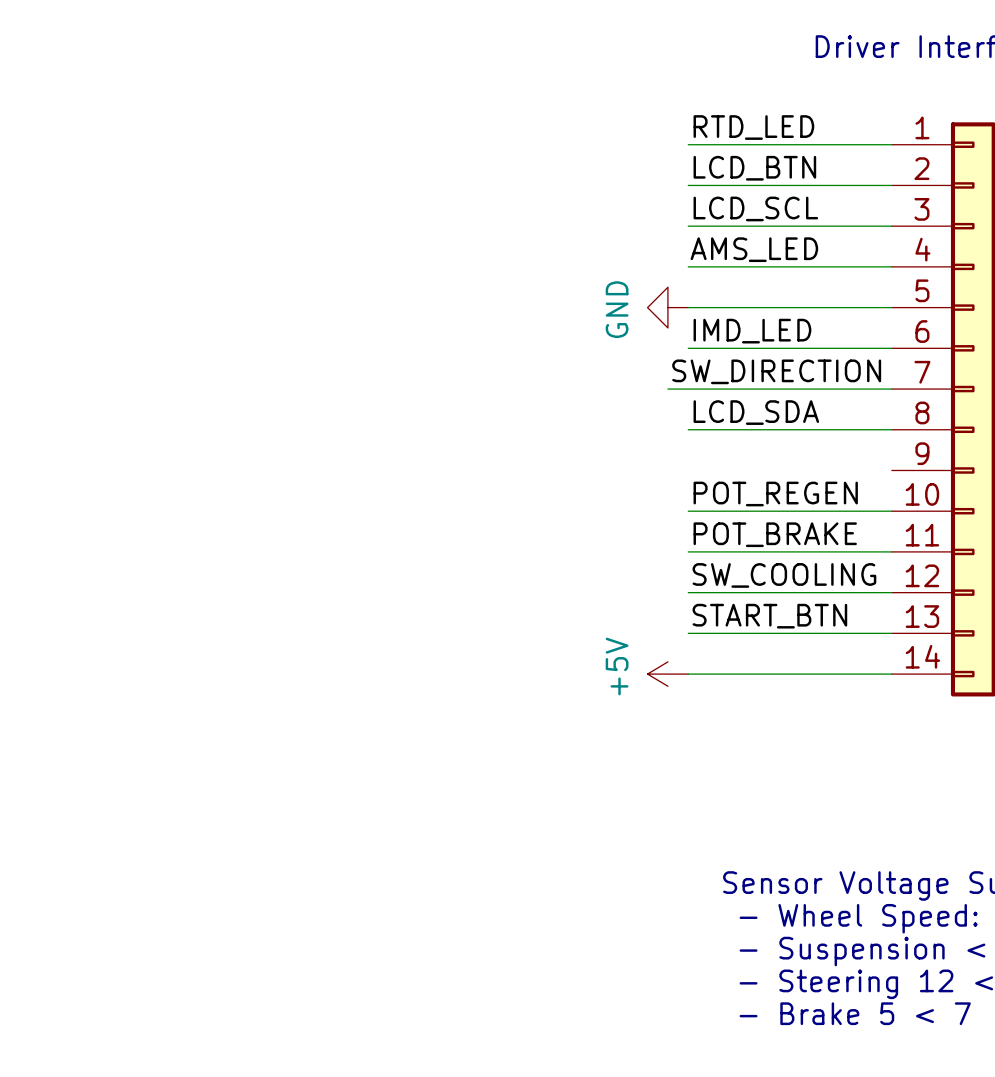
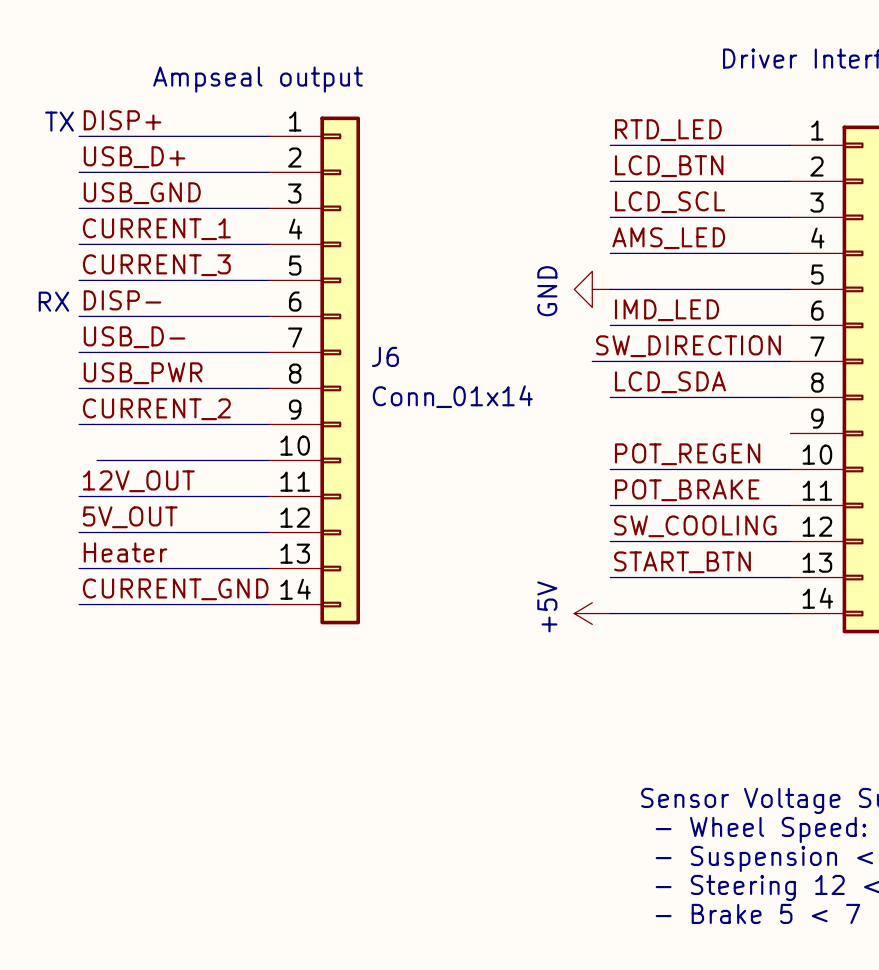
text: none -> Ampseal output (258, 79)
label: none -> DISP+ (122, 120)
text: none -> TX (59, 121)
wire: none -> (79, 136) (268, 136)
label: none -> USB_D+ (134, 157)
wire: none -> (79, 172) (268, 172)
label: none -> USB_GND (142, 193)
wire: none -> (79, 208) (268, 208)
label: none -> CURRENT_1 (156, 229)
wire: none -> (79, 244) (268, 244)
label: none -> CURRENT_3 (156, 265)
wire: none -> (79, 280) (268, 280)
label: none -> DISP- (122, 300)
text: none -> RX (53, 301)
wire: none -> (79, 316) (268, 316)
label: none -> USB_D- (134, 337)
wire: none -> (79, 352) (268, 352)
J6: none -> Conn_01x14 (314, 370)
label: none -> USB_PWR (143, 373)
wire: none -> (79, 388) (268, 388)
label: none -> CURRENT_2 (156, 409)
wire: none -> (79, 424) (268, 424)
wire: none -> (97, 460) (268, 460)
label: none -> 12V_OUT (138, 481)
wire: none -> (79, 496) (268, 496)
label: none -> 5V_OUT (130, 517)
wire: none -> (79, 532) (268, 532)
label: none -> Heater (125, 552)
wire: none -> (79, 568) (268, 568)
label: none -> CURRENT_GND (175, 589)
wire: none -> (79, 604) (268, 604)

